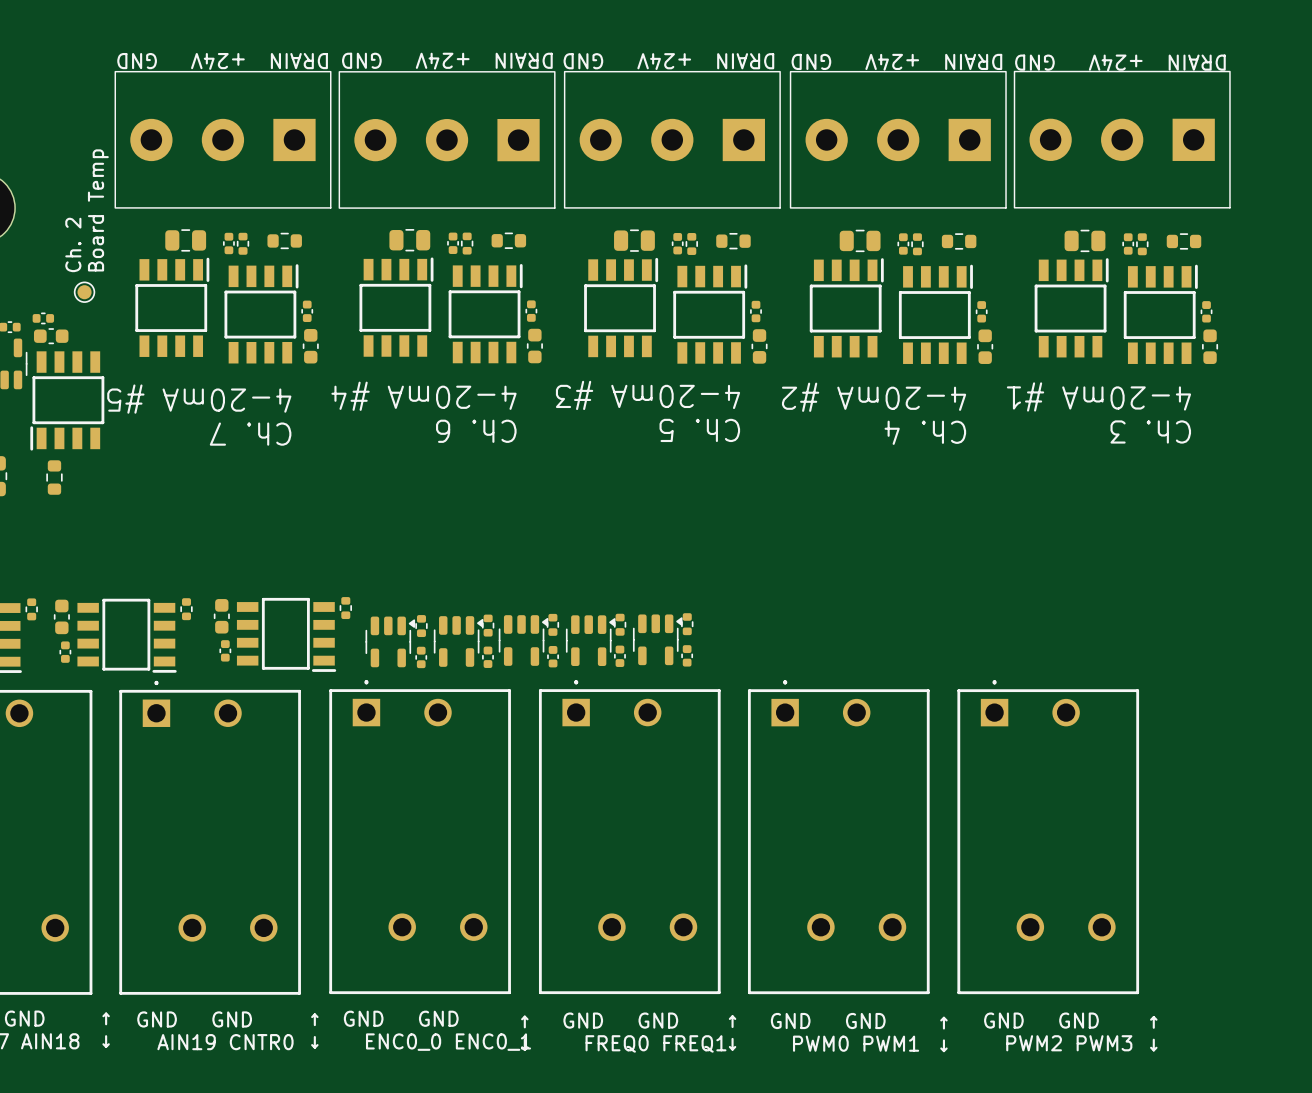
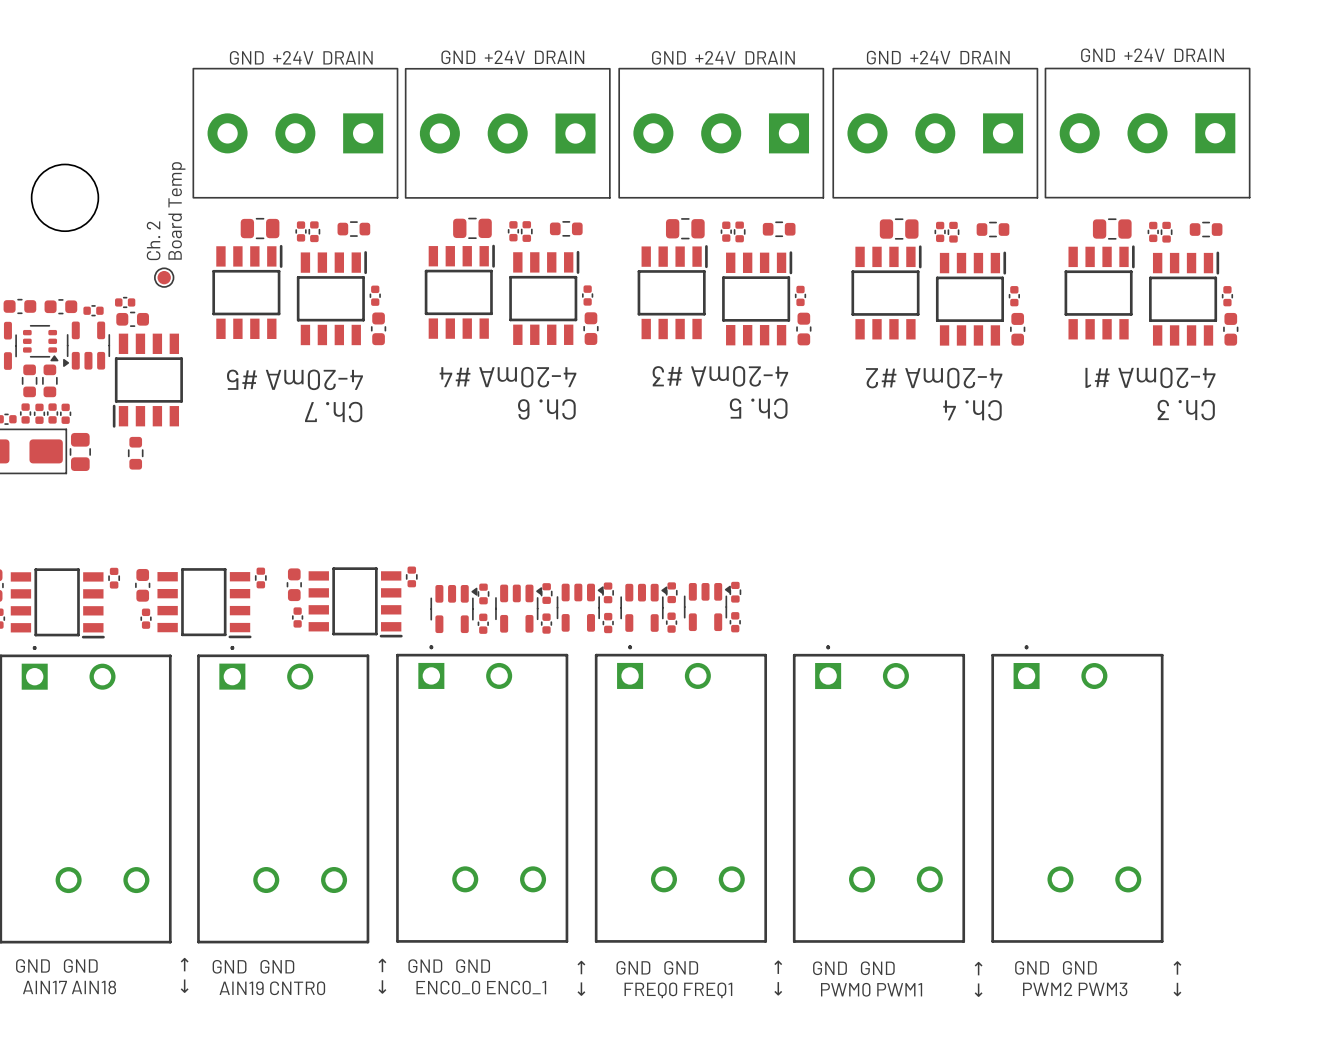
text: DRAIN +24V GND (222, 61) -> GND +24V DRAIN (301, 57)
text: DRAIN +24V GND (447, 61) -> GND +24V DRAIN (512, 57)
text: DRAIN +24V GND (668, 61) -> GND +24V DRAIN (723, 57)
text: DRAIN +24V GND (896, 62) -> GND +24V DRAIN (938, 57)
text: DRAIN +24V GND (1120, 62) -> GND +24V DRAIN (1152, 55)

